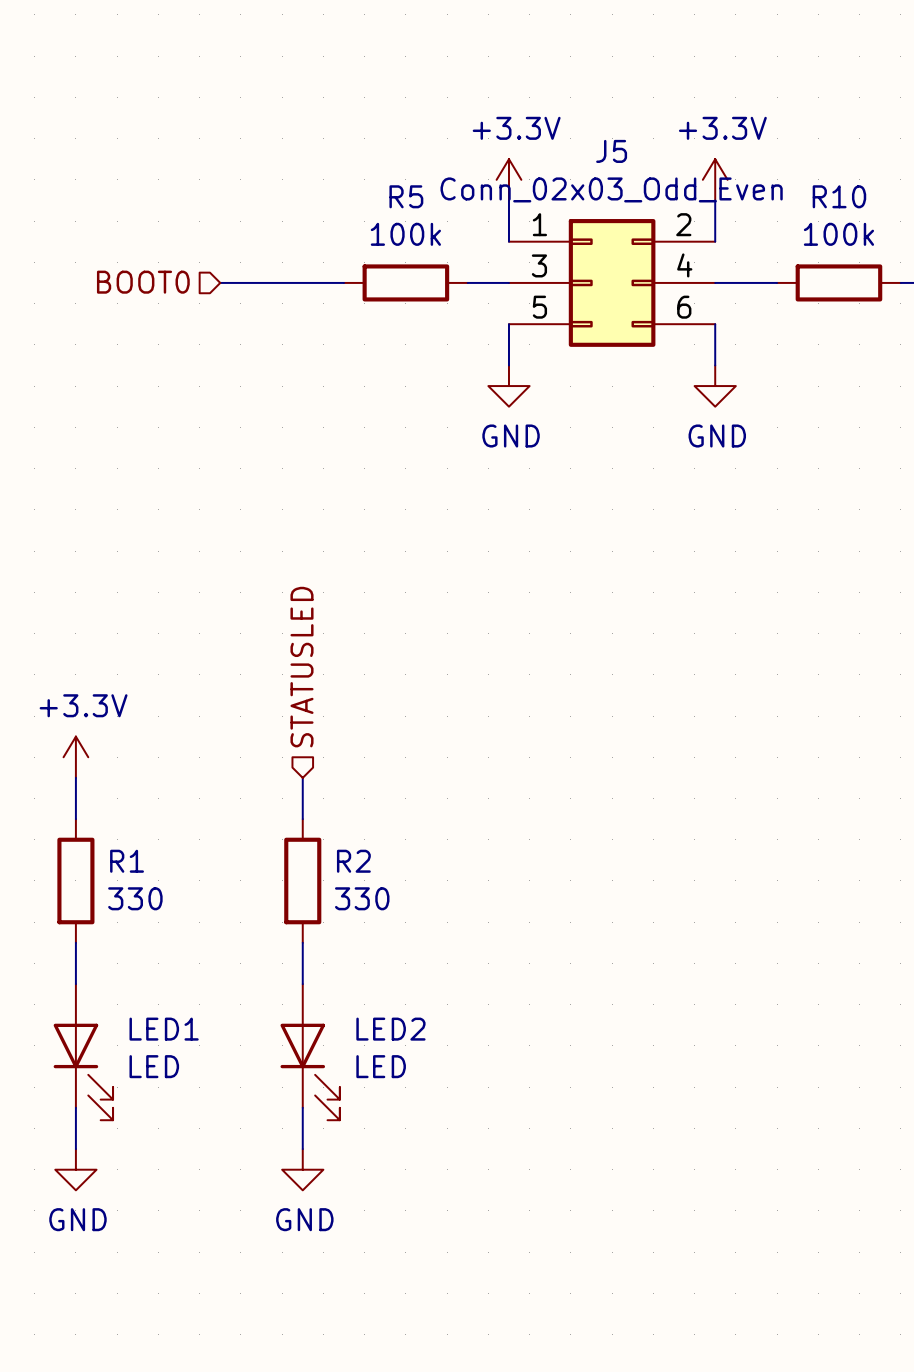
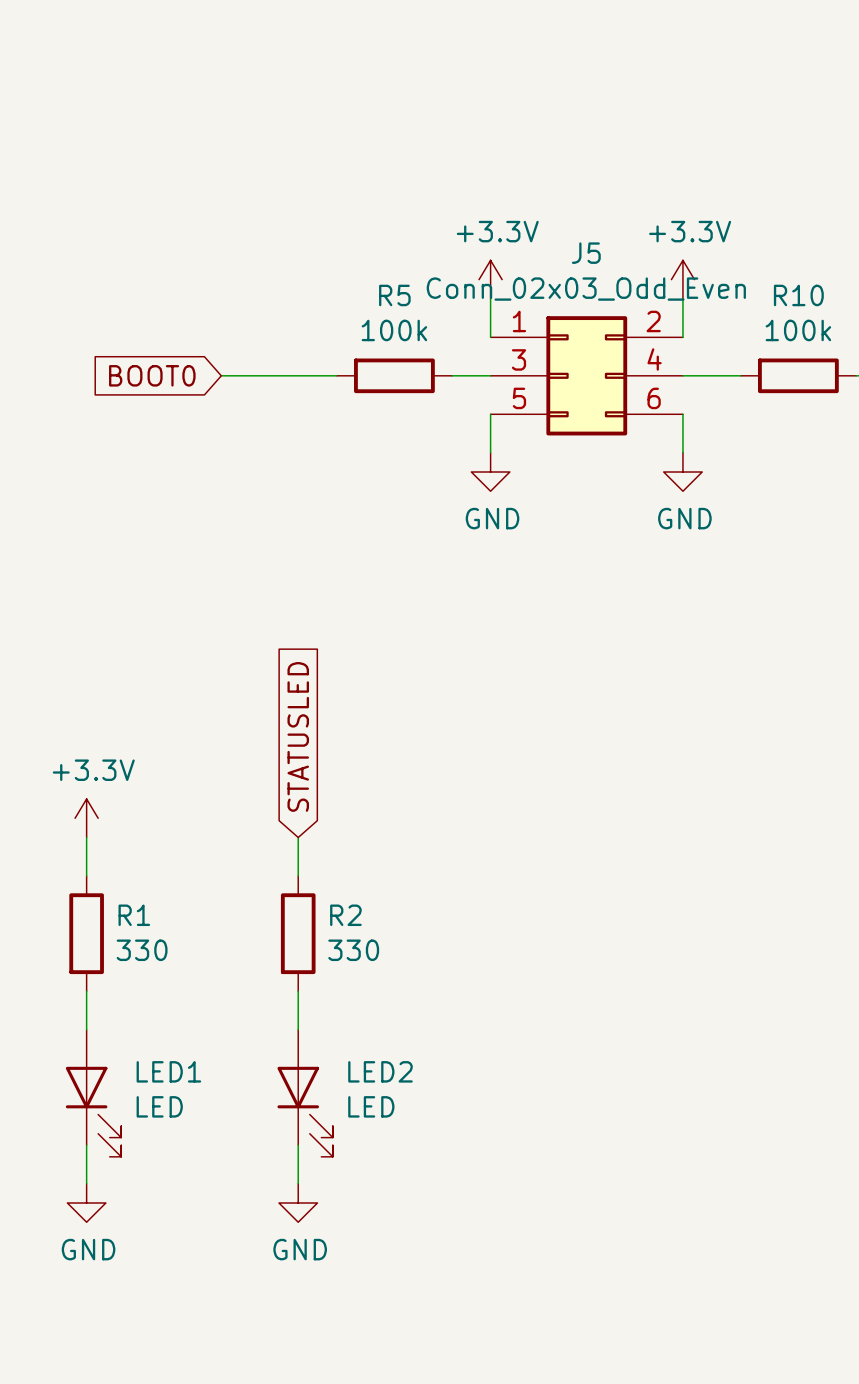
hierarchical label: BOOT0 (143, 282) -> none
global label: none -> BOOT0 (152, 375)
hierarchical label: STATUSLED (301, 667) -> none
global label: none -> STATUSLED (298, 736)

